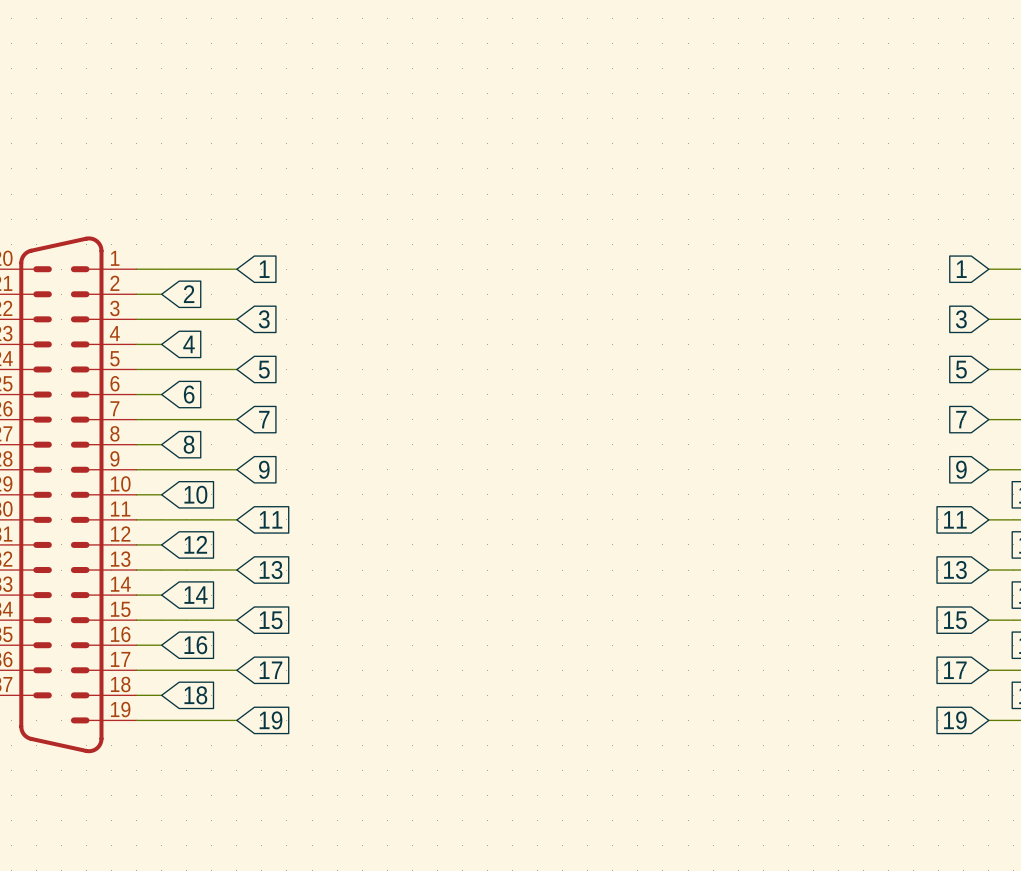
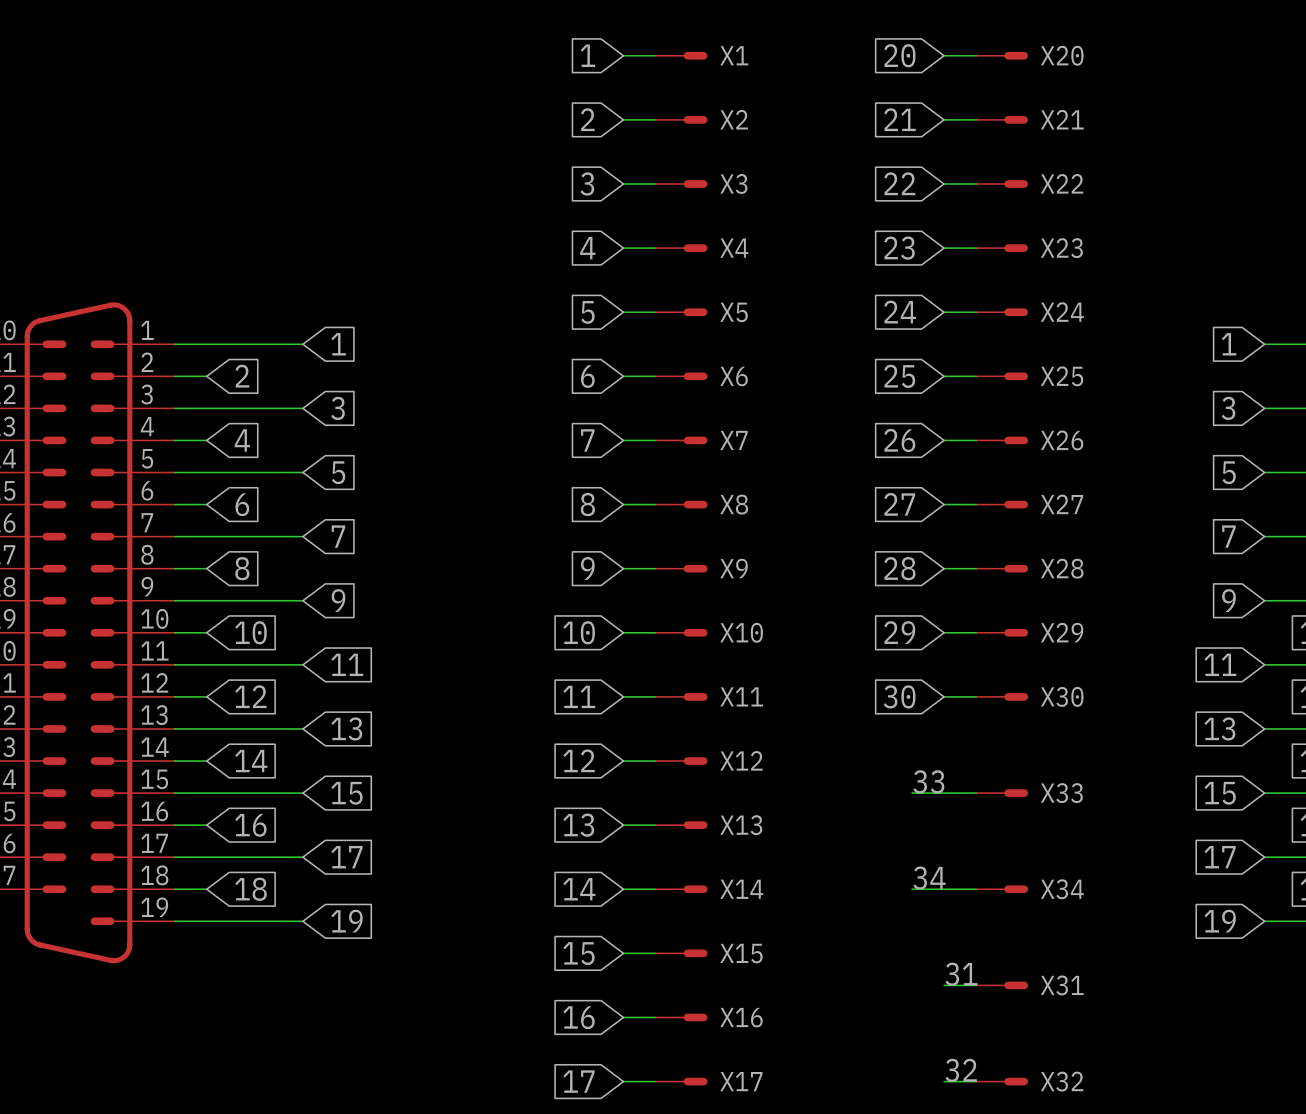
global label: none -> 1 (587, 55)
wire: none -> (623, 55) (655, 55)
X1: none -> (681, 55)
global label: none -> 20 (899, 55)
wire: none -> (944, 55) (976, 55)
X20: none -> (1002, 55)
global label: none -> 2 (587, 119)
wire: none -> (623, 119) (655, 119)
X2: none -> (681, 119)
global label: none -> 21 (900, 119)
wire: none -> (944, 119) (976, 119)
X21: none -> (1002, 119)
global label: none -> 3 (587, 184)
wire: none -> (623, 184) (655, 184)
X3: none -> (681, 184)
global label: none -> 22 (899, 183)
wire: none -> (944, 184) (976, 184)
X22: none -> (1002, 184)
global label: none -> 4 (587, 248)
wire: none -> (623, 248) (655, 248)
X4: none -> (681, 248)
global label: none -> 23 (899, 248)
wire: none -> (944, 248) (976, 248)
X23: none -> (1002, 248)
global label: none -> 5 (587, 312)
wire: none -> (623, 312) (655, 312)
X5: none -> (681, 312)
global label: none -> 24 (900, 312)
wire: none -> (944, 312) (976, 312)
X24: none -> (1002, 312)
global label: none -> 6 (587, 376)
wire: none -> (623, 376) (655, 376)
X6: none -> (681, 376)
global label: none -> 25 (899, 376)
wire: none -> (944, 376) (976, 376)
X25: none -> (1002, 376)
global label: none -> 7 (587, 440)
wire: none -> (623, 440) (655, 440)
X7: none -> (681, 440)
global label: none -> 26 (899, 440)
wire: none -> (944, 440) (976, 440)
X26: none -> (1002, 440)
global label: none -> 8 (587, 504)
wire: none -> (623, 504) (655, 504)
X8: none -> (681, 504)
global label: none -> 27 (899, 504)
wire: none -> (944, 504) (976, 504)
X27: none -> (1002, 504)
global label: none -> 9 (587, 568)
wire: none -> (623, 568) (655, 568)
X9: none -> (681, 568)
global label: none -> 28 (899, 568)
wire: none -> (944, 568) (976, 568)
X28: none -> (1002, 568)
global label: none -> 10 (579, 632)
wire: none -> (623, 632) (655, 632)
X10: none -> (681, 632)
global label: none -> 29 (899, 632)
wire: none -> (944, 632) (976, 632)
X29: none -> (1002, 632)
global label: none -> 11 (579, 696)
wire: none -> (623, 696) (655, 696)
X11: none -> (681, 696)
global label: none -> 30 (899, 696)
wire: none -> (944, 696) (976, 696)
X30: none -> (1002, 696)
global label: none -> 12 (579, 760)
wire: none -> (623, 761) (655, 761)
X12: none -> (681, 761)
label: none -> 33 (928, 781)
wire: none -> (911, 793) (976, 793)
X33: none -> (1002, 793)
global label: none -> 13 (578, 825)
wire: none -> (623, 825) (655, 825)
X13: none -> (681, 825)
label: none -> 34 (929, 878)
global label: none -> 14 (579, 889)
wire: none -> (623, 889) (655, 889)
X14: none -> (681, 889)
wire: none -> (911, 889) (976, 889)
X34: none -> (1002, 889)
global label: none -> 15 (578, 953)
wire: none -> (623, 953) (655, 953)
X15: none -> (681, 953)
label: none -> 31 (961, 974)
wire: none -> (944, 985) (976, 985)
X31: none -> (1002, 985)
global label: none -> 16 (579, 1017)
wire: none -> (623, 1017) (655, 1017)
X16: none -> (681, 1017)
label: none -> 32 (961, 1070)
global label: none -> 17 (578, 1081)
wire: none -> (623, 1081) (655, 1081)
X17: none -> (681, 1081)
wire: none -> (944, 1081) (976, 1081)
X32: none -> (1002, 1081)

